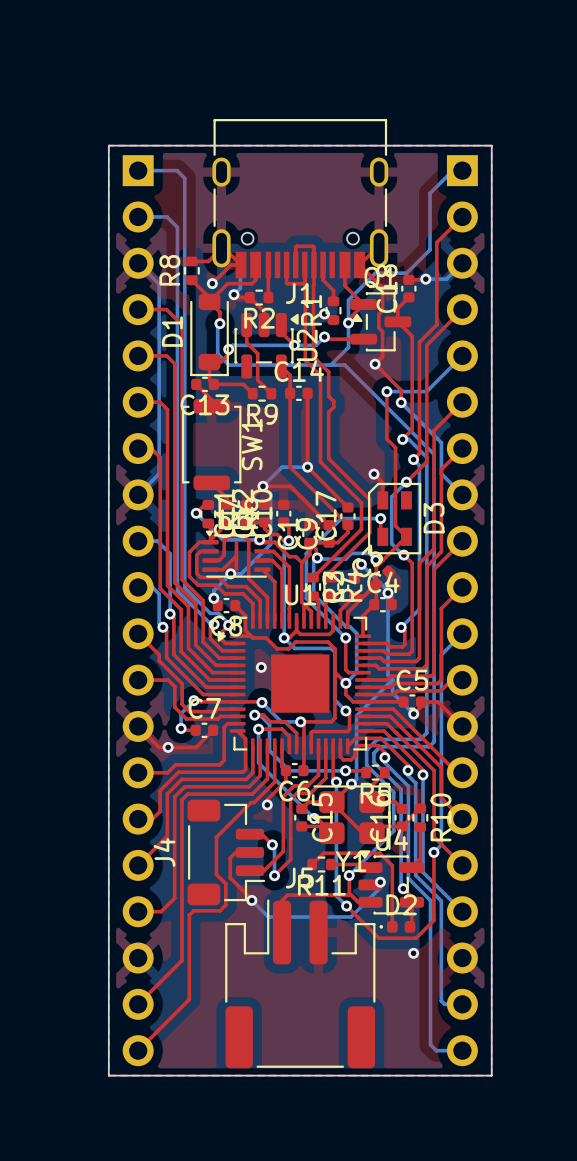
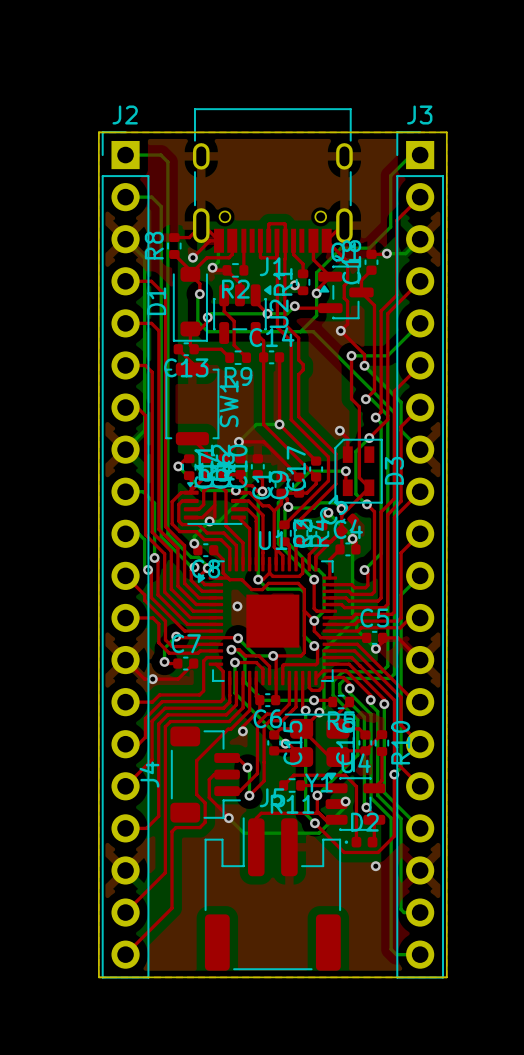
J2 side: bottom (138, 610) -> top (125, 554)
J3 side: bottom (462, 610) -> top (420, 554)

